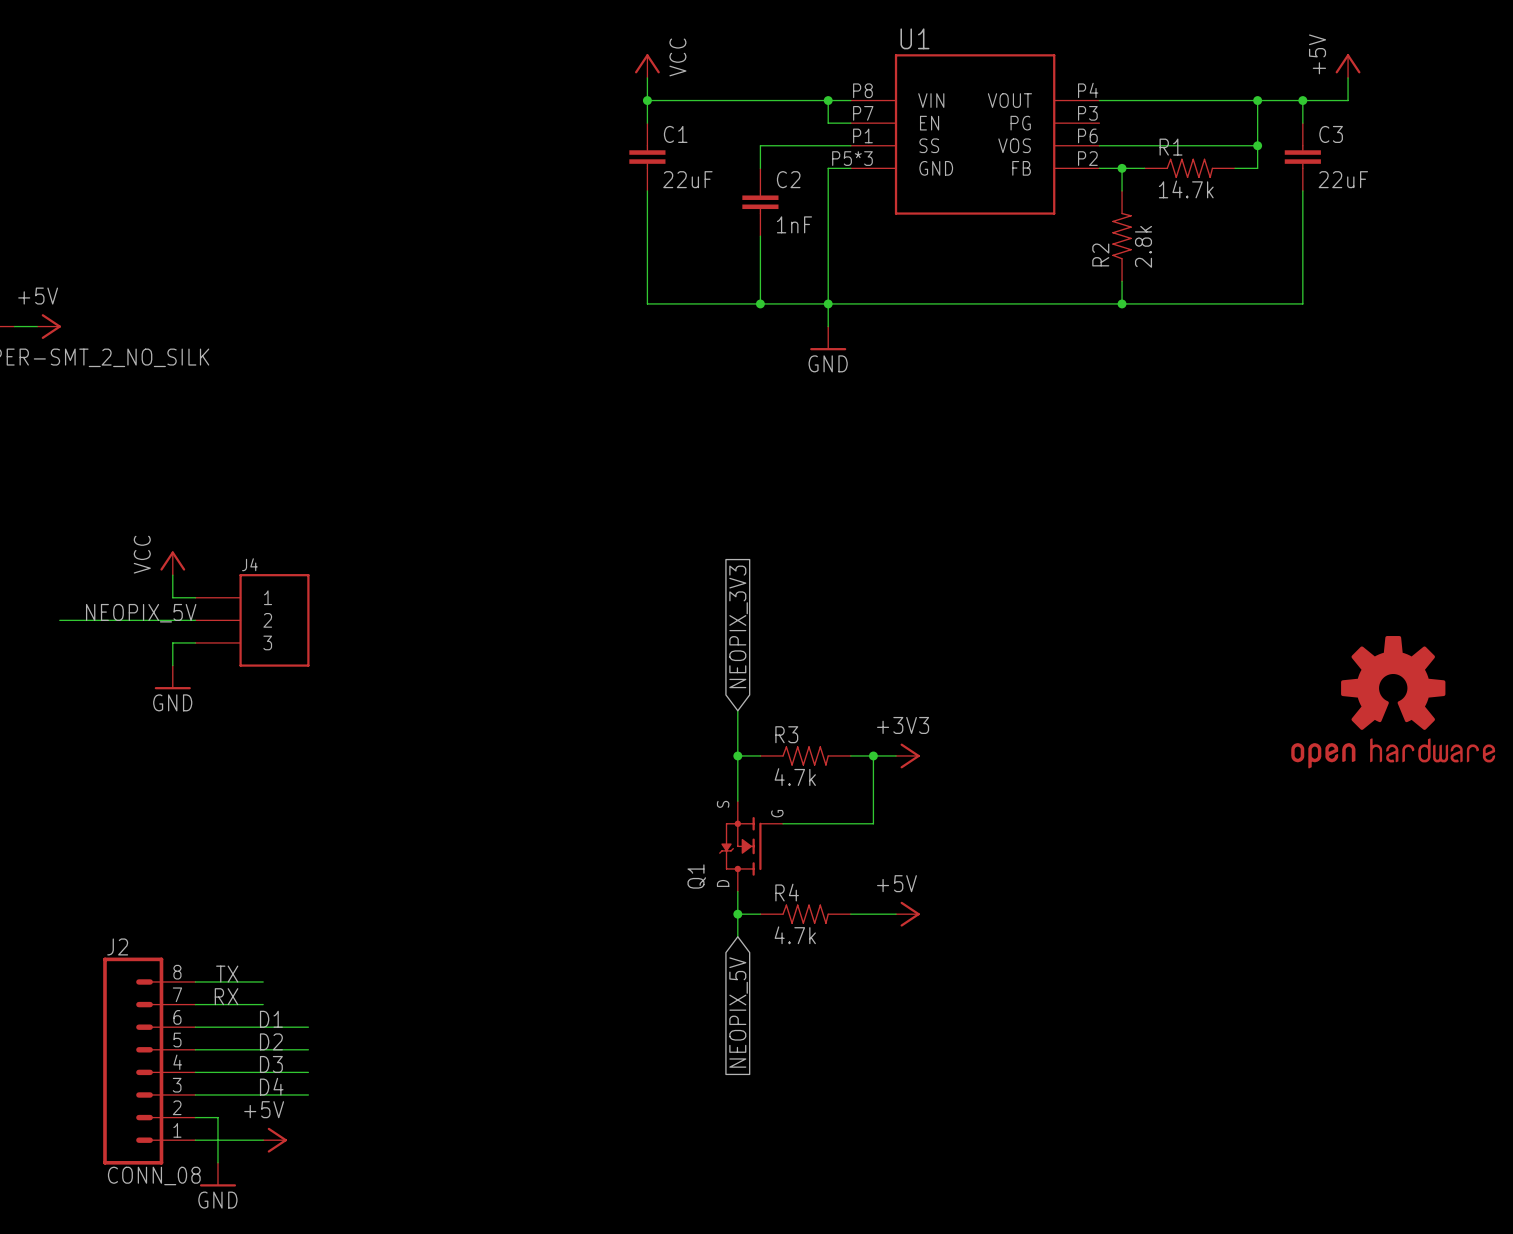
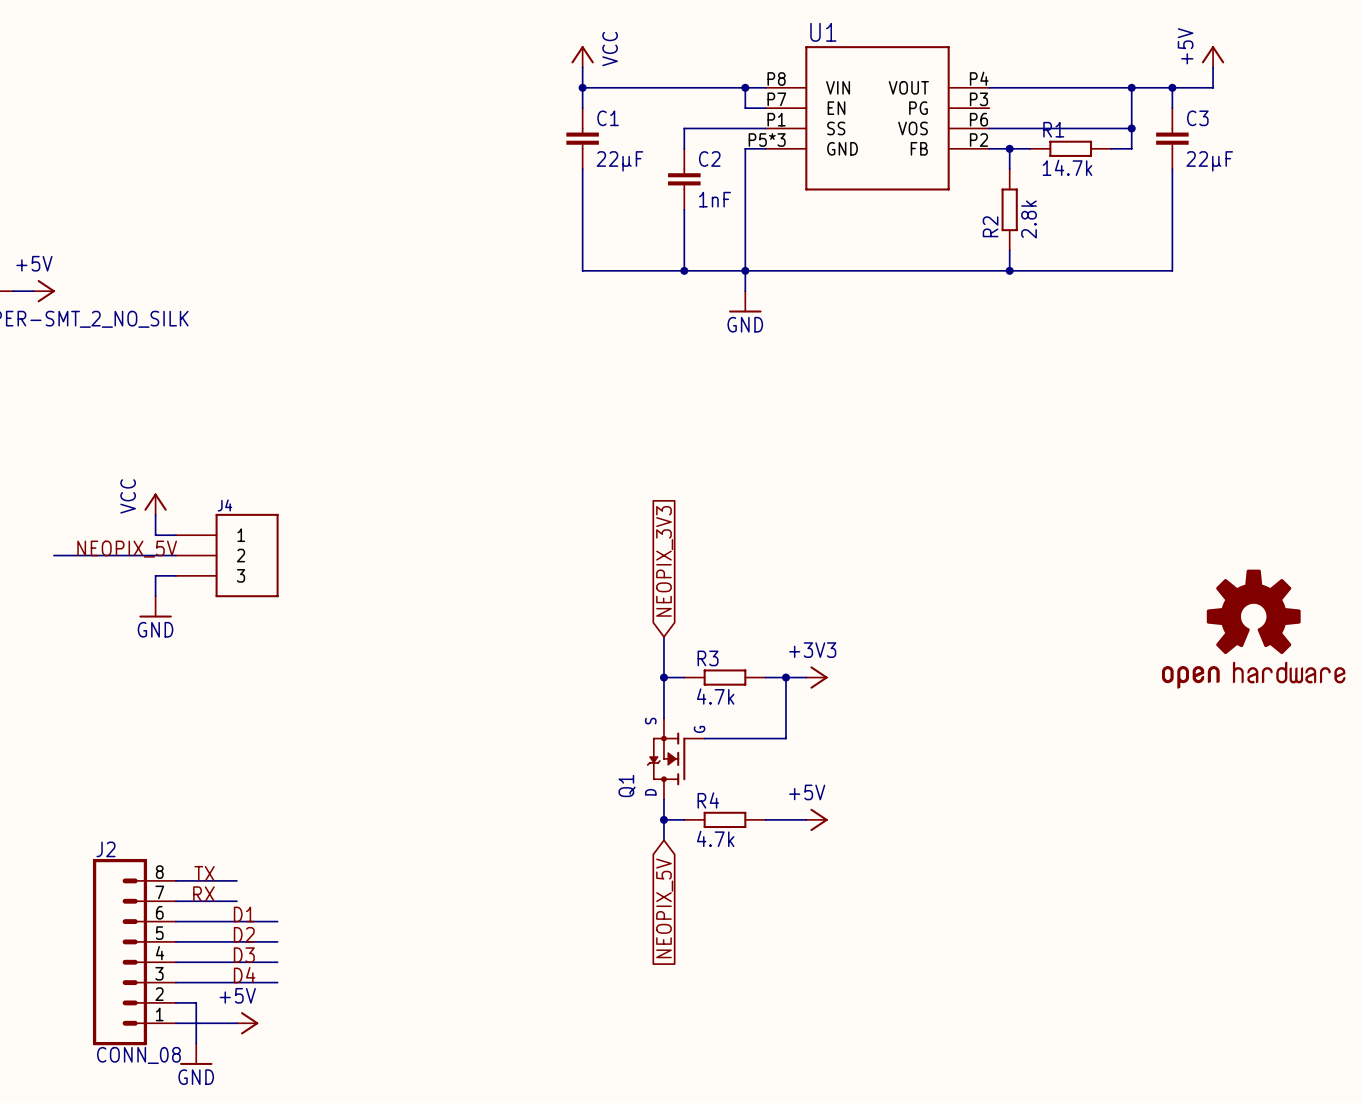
R1 symbol: [1144, 158, 1236, 179] -> [1030, 140, 1112, 157]
C1 value: 22uF (687, 179) -> 22µF (619, 161)
C3 value: 22uF (1343, 179) -> 22µF (1209, 161)
R2 symbol: [1112, 190, 1132, 282] -> [1001, 169, 1018, 251]
R3 symbol: [760, 746, 851, 766] -> [684, 669, 766, 686]
R4 symbol: [760, 904, 851, 924] -> [684, 811, 766, 829]

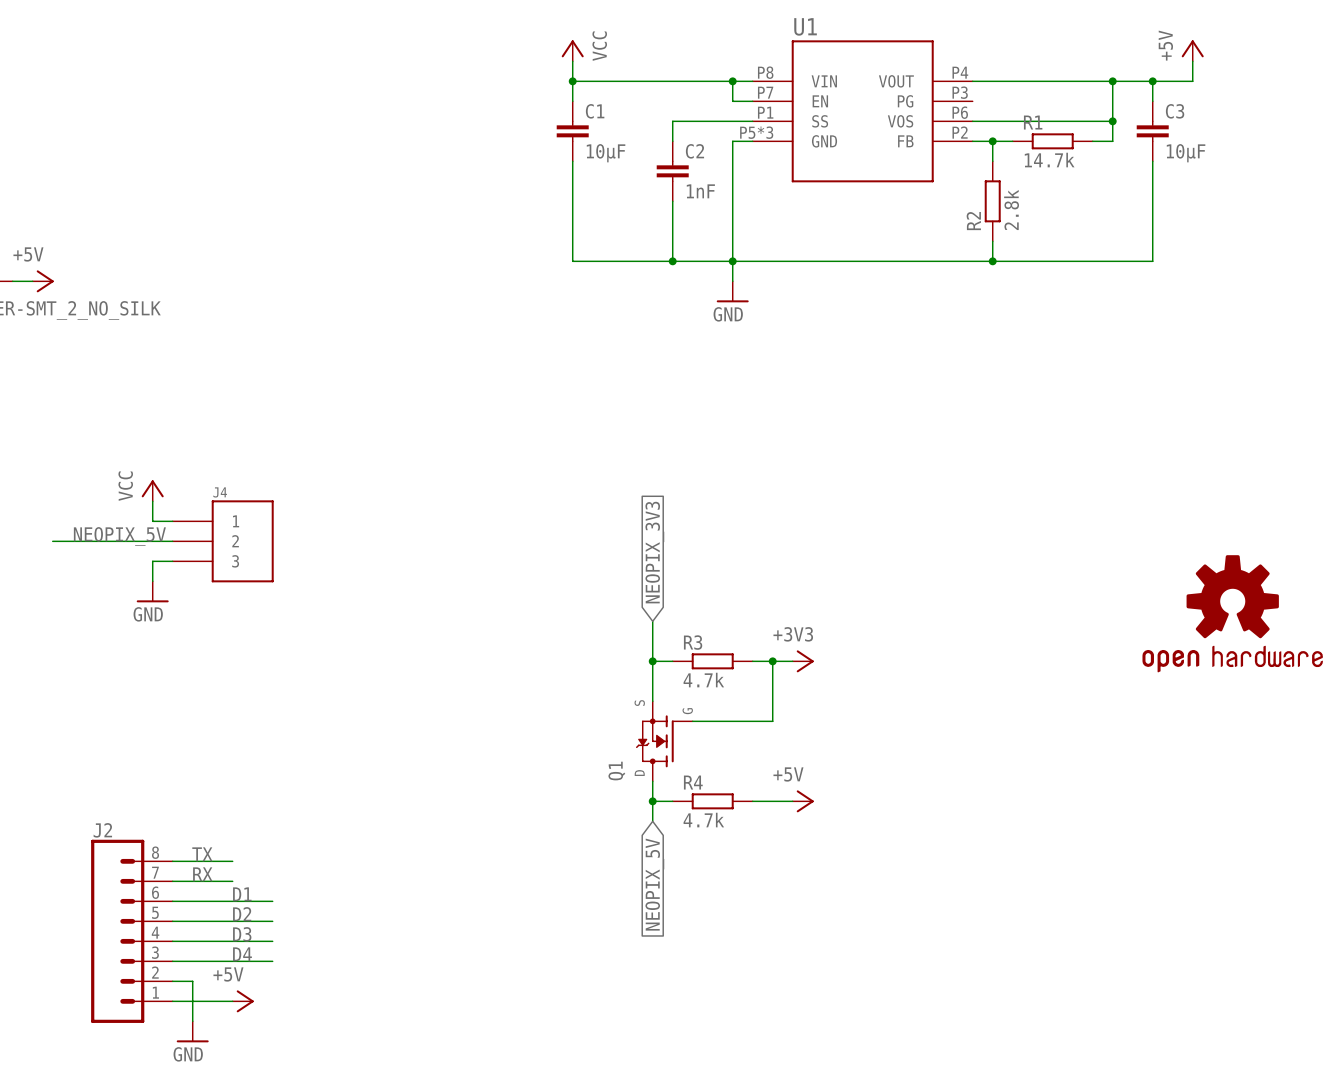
C1 value: 22µF (619, 161) -> 10µF (606, 153)
C3 value: 22µF (1209, 161) -> 10µF (1186, 153)
J2 value: CONN_08 (138, 1055) -> none

